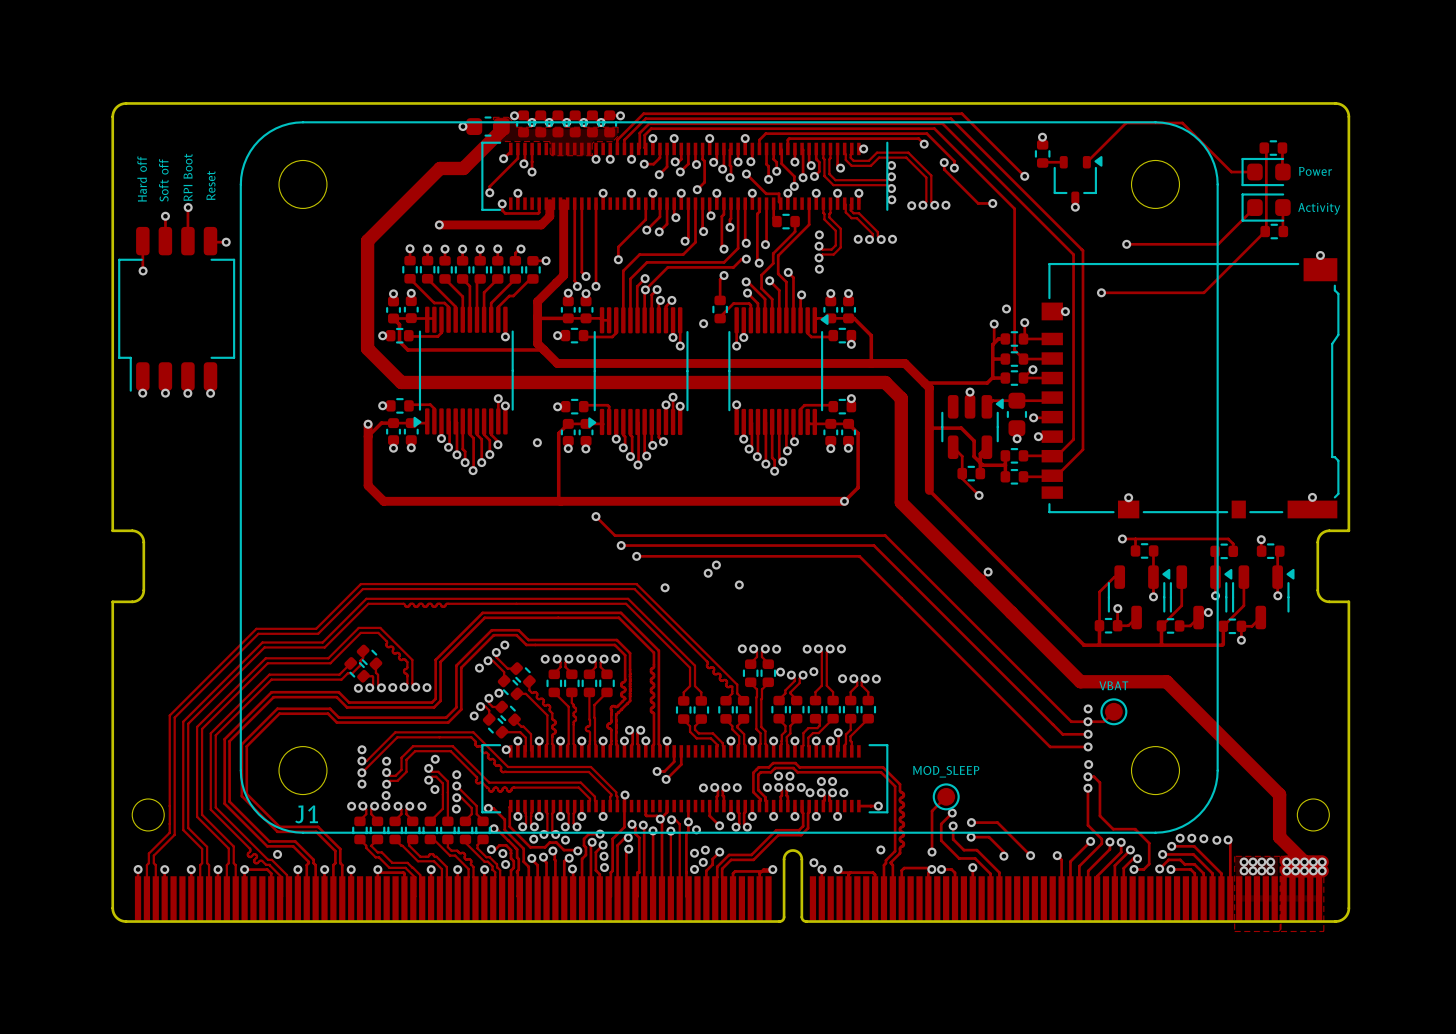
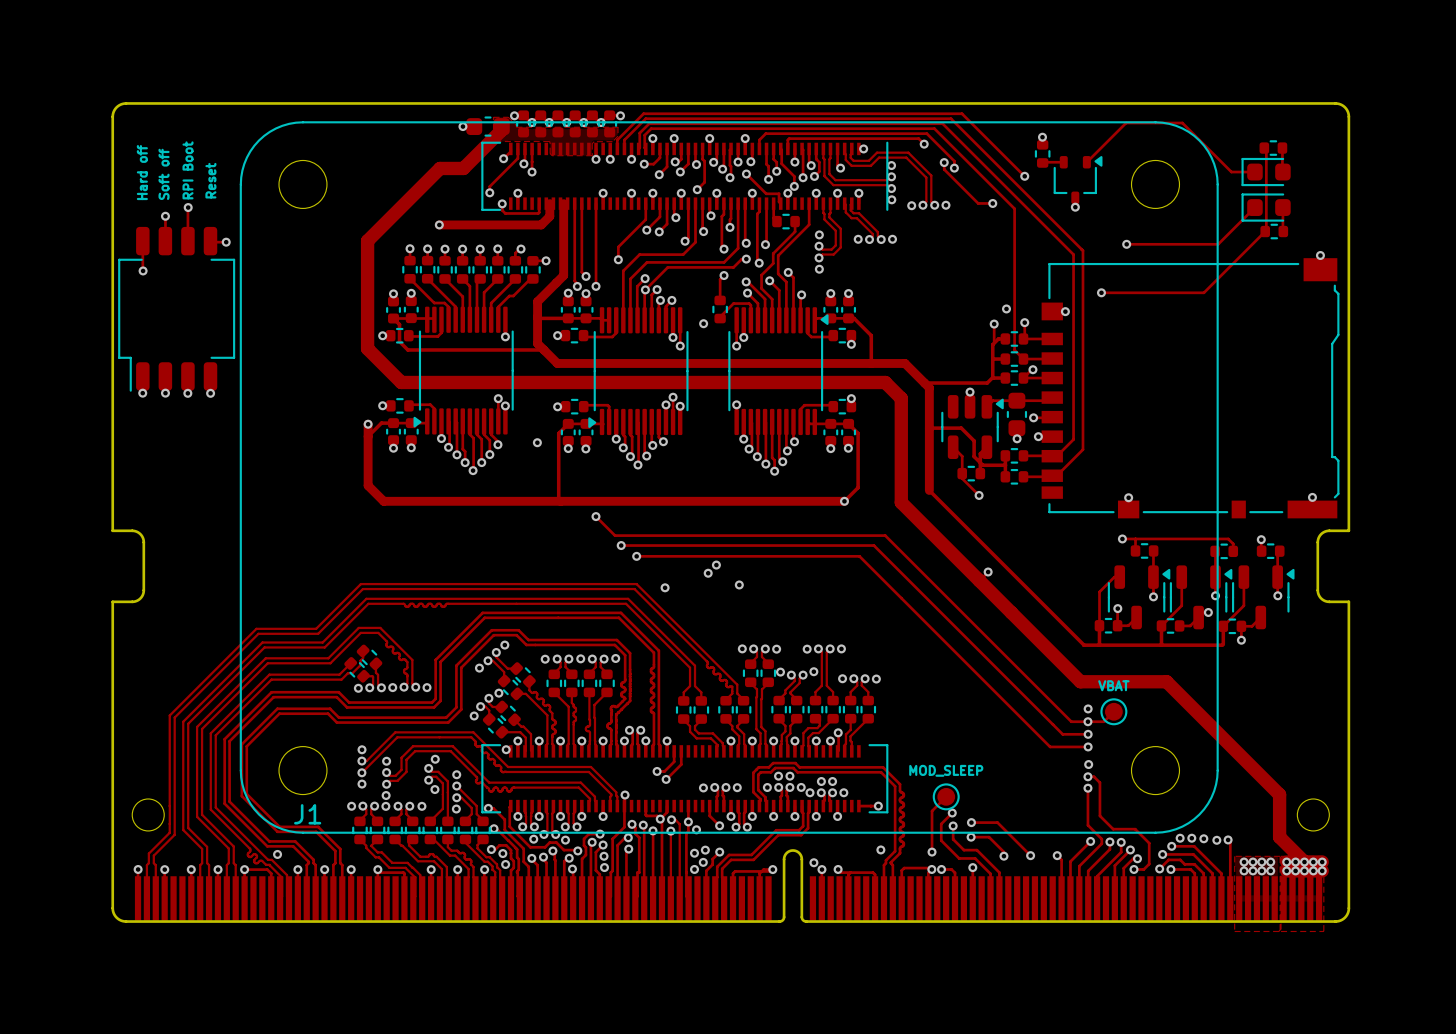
Power name: Power (1315, 171) -> none
Activity name: Activity (1319, 208) -> none

